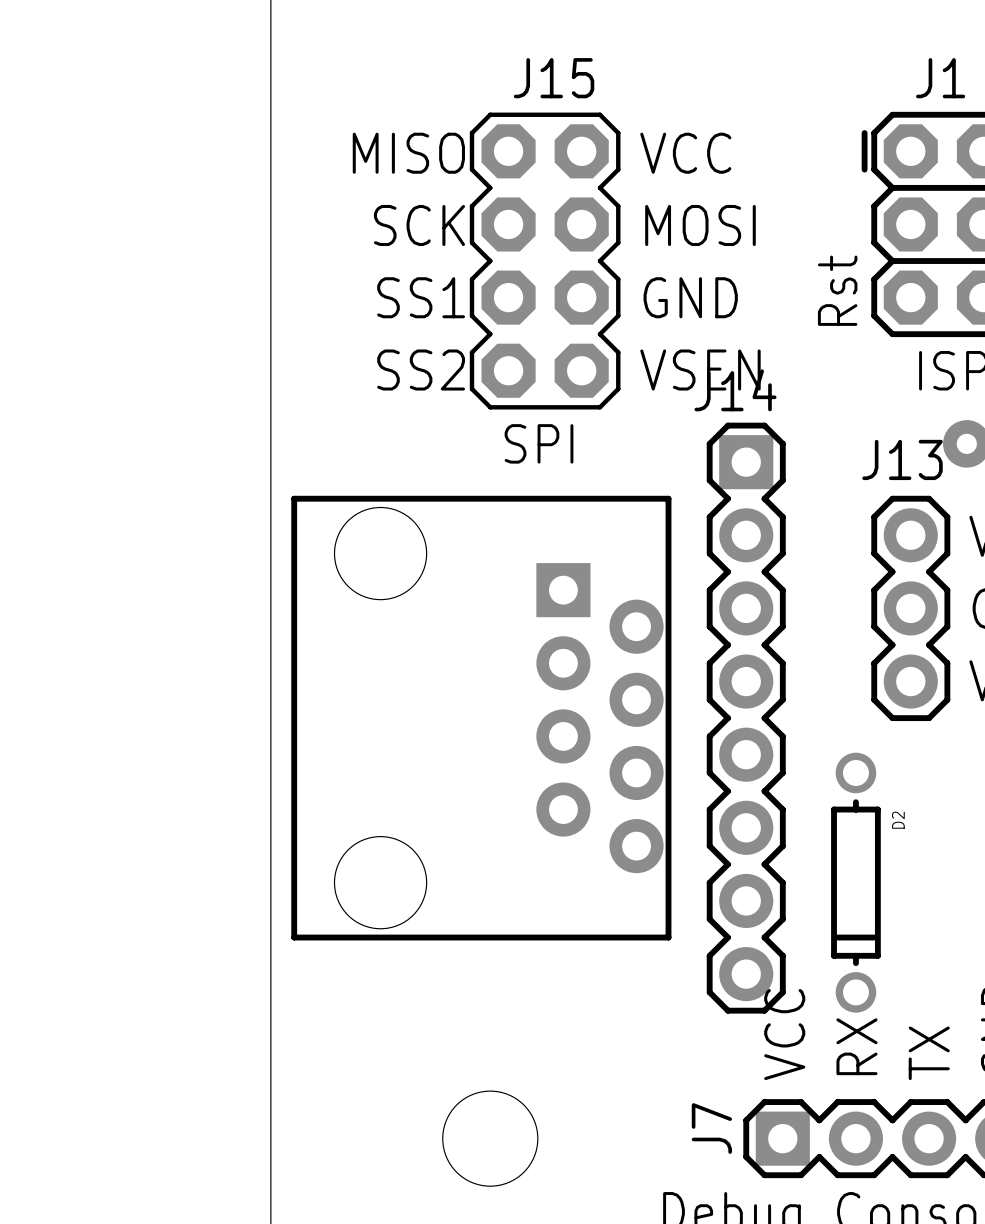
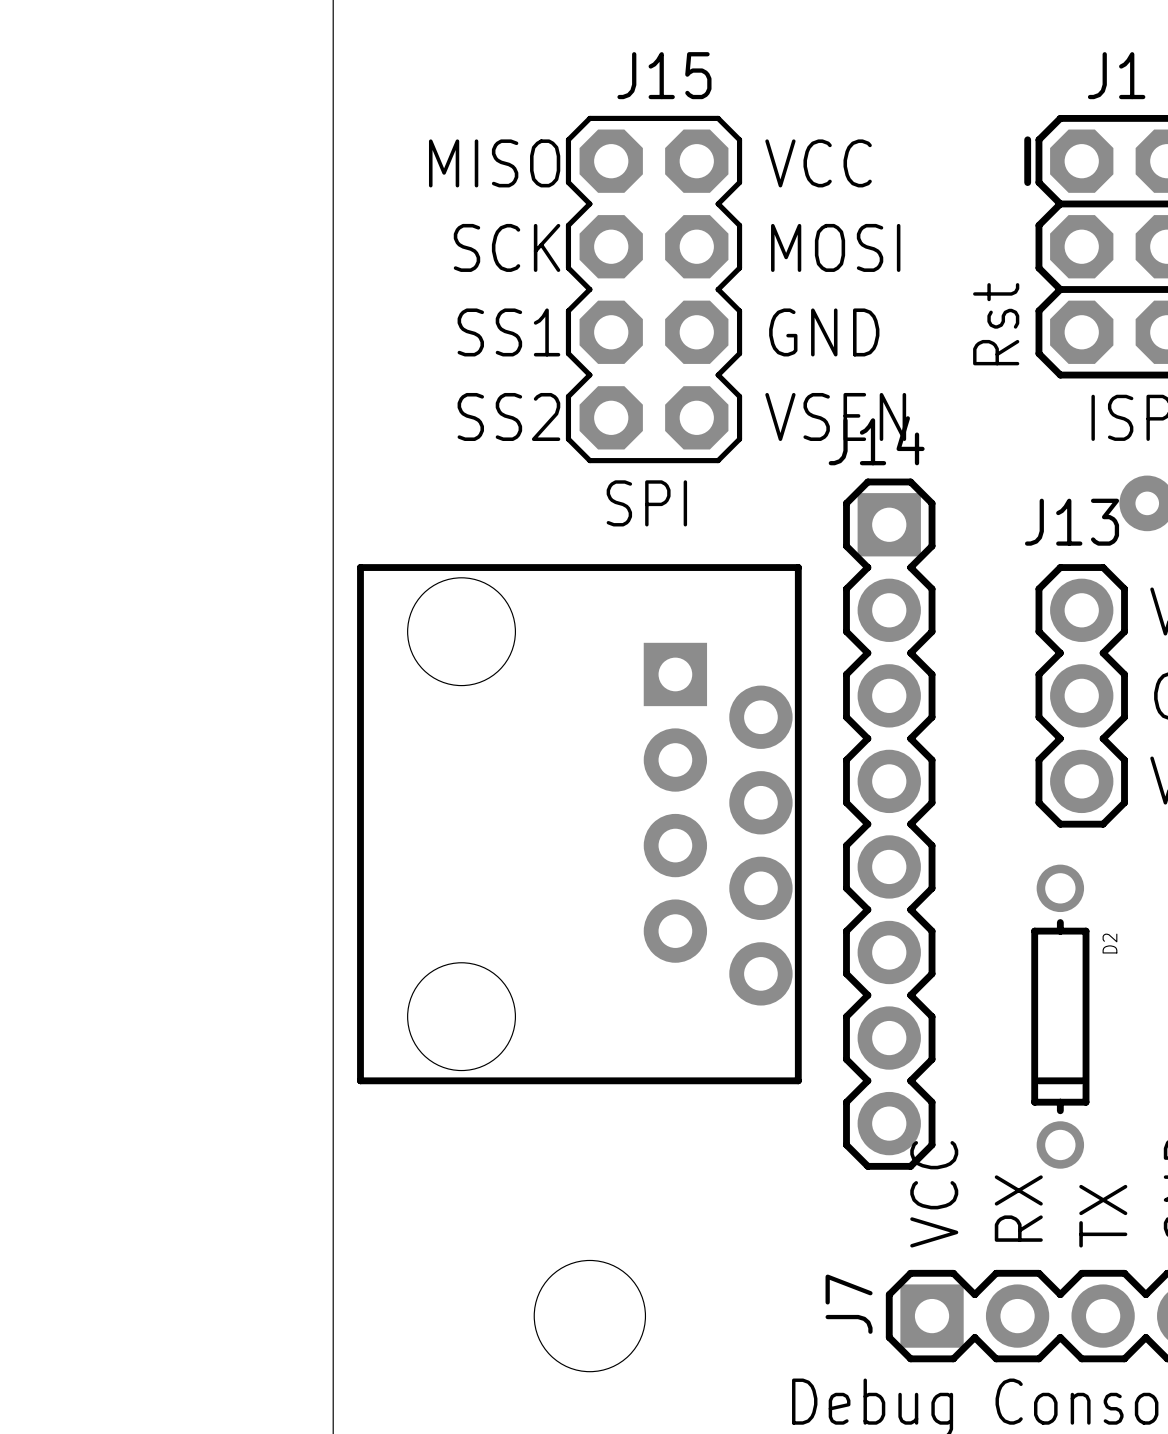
D2 position: (855, 882) -> (1060, 1016)

